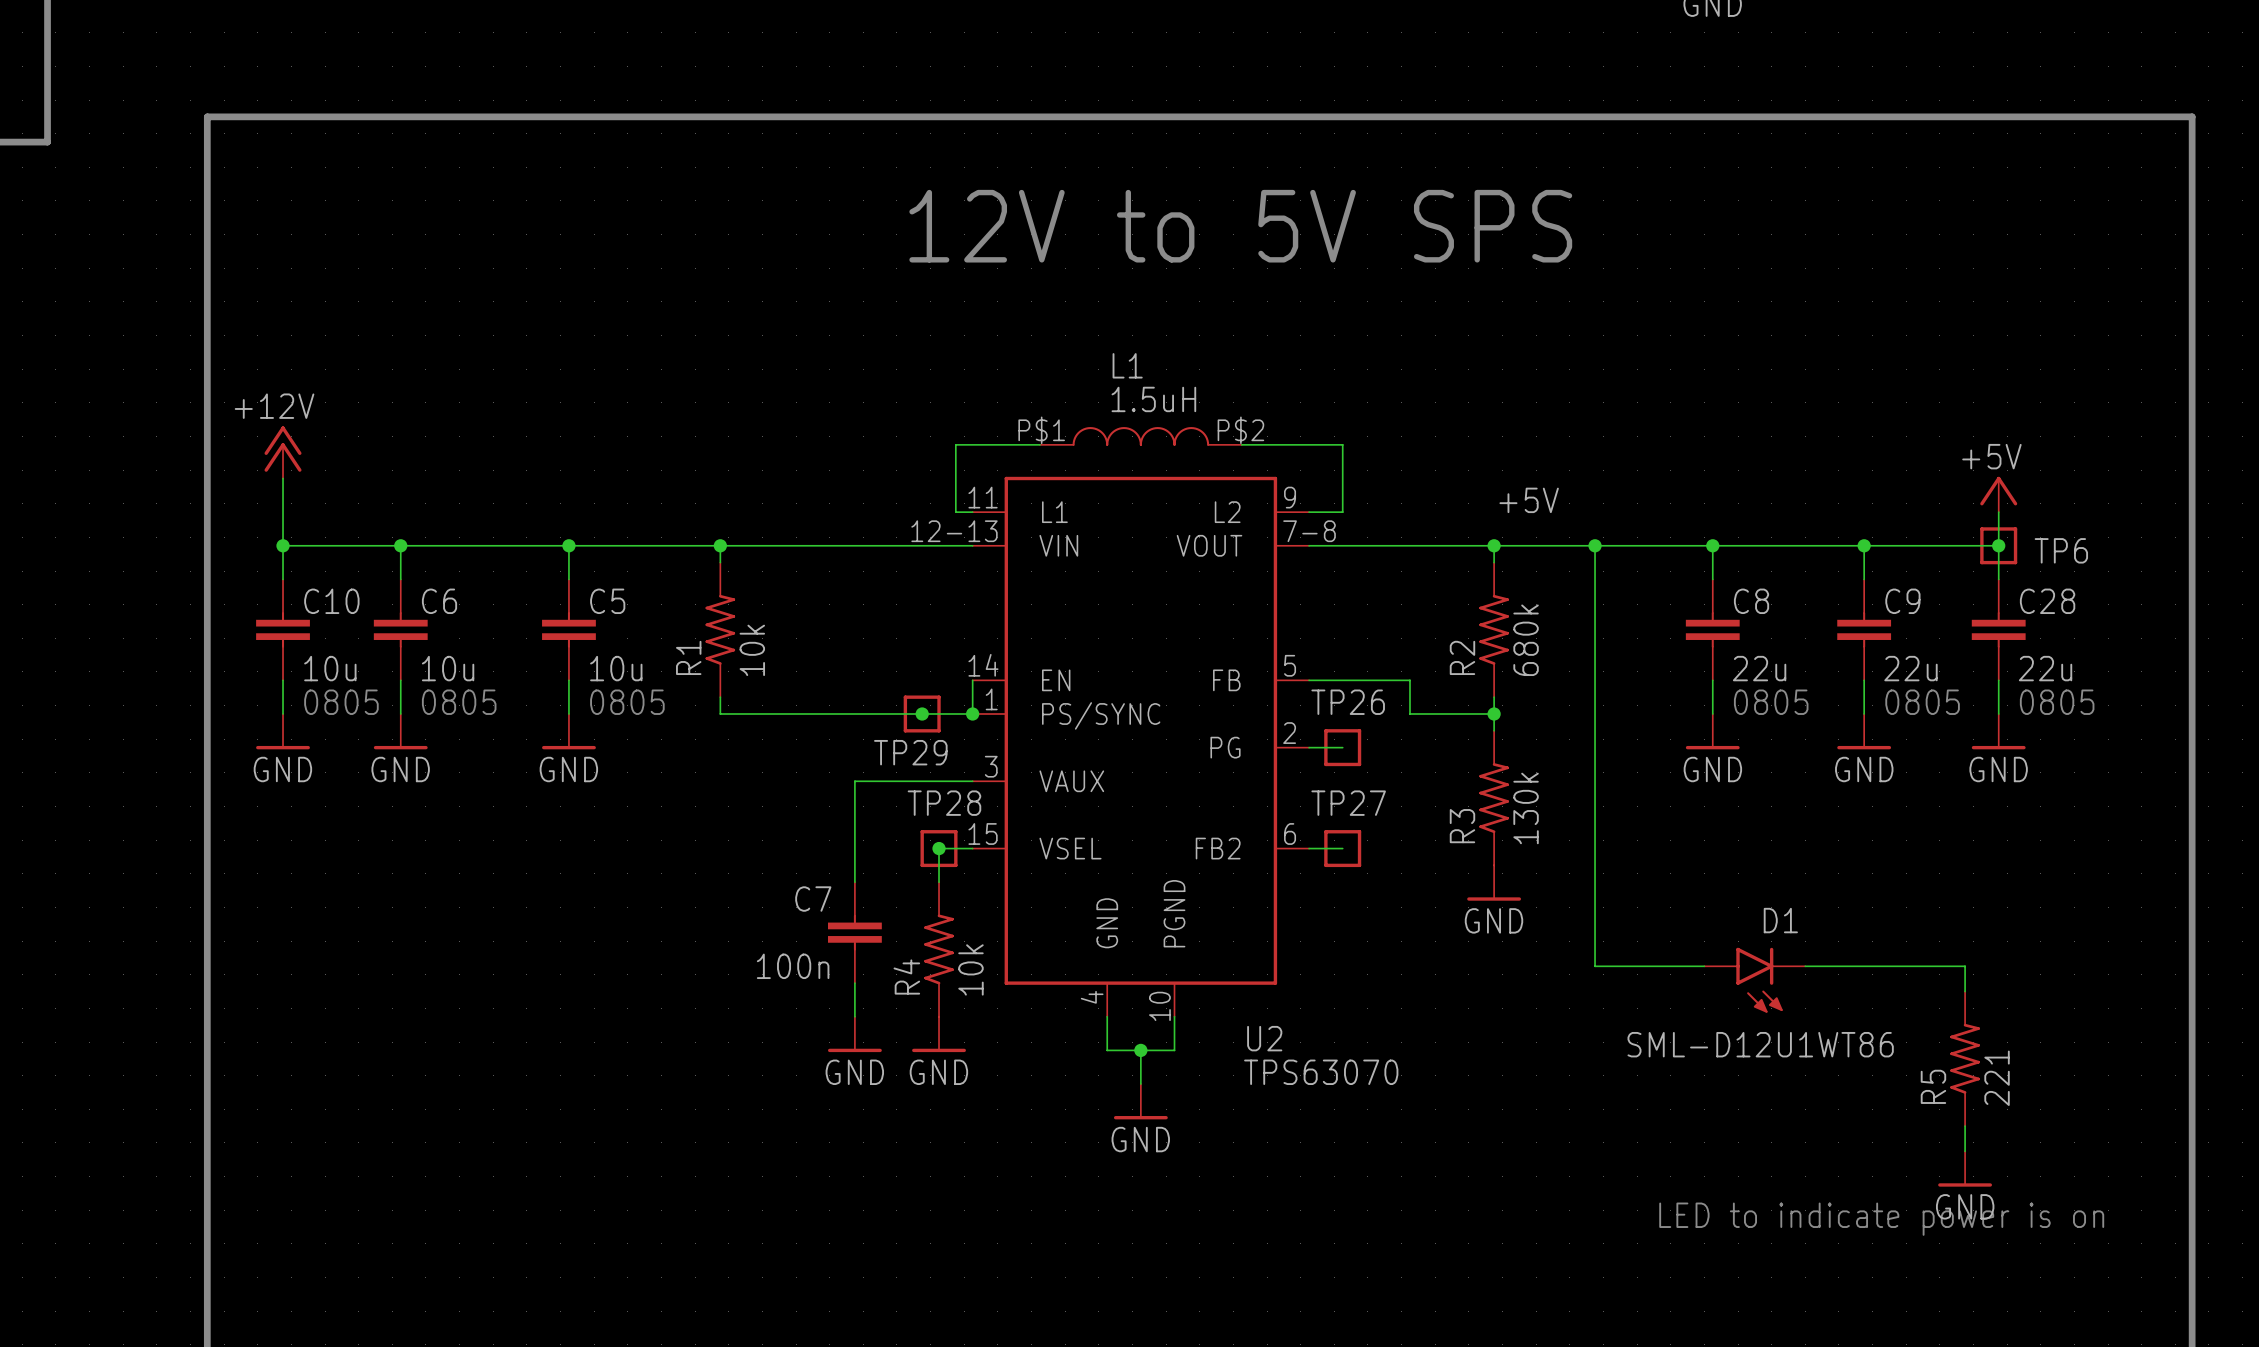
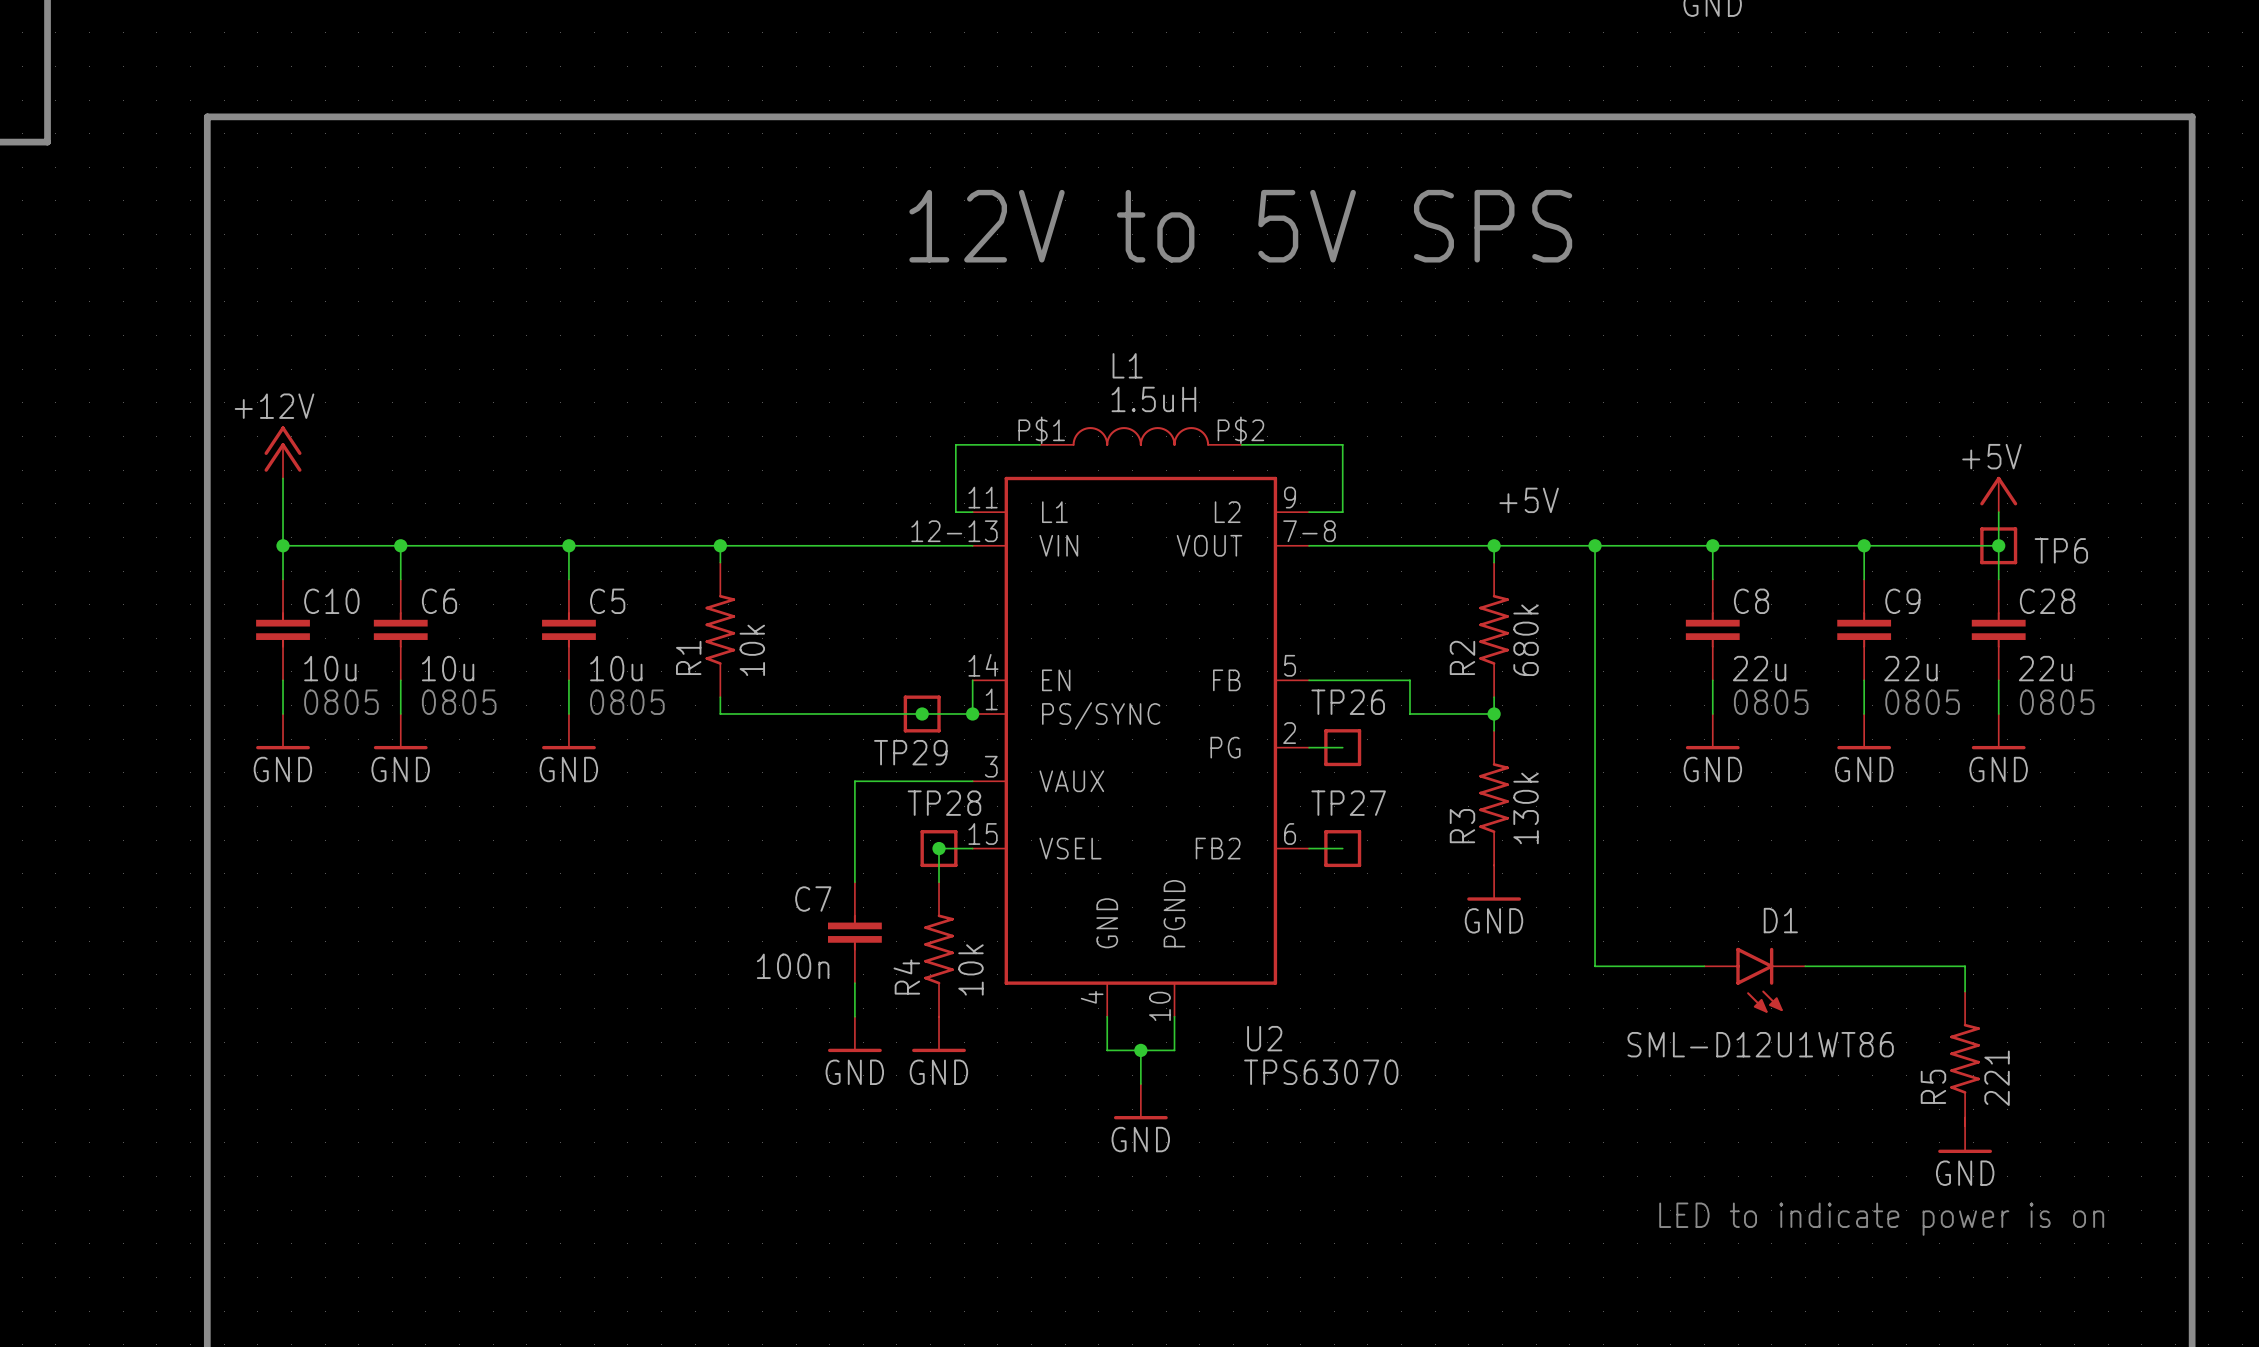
power symbol position: GND (1965, 1168) -> GND (1965, 1135)

